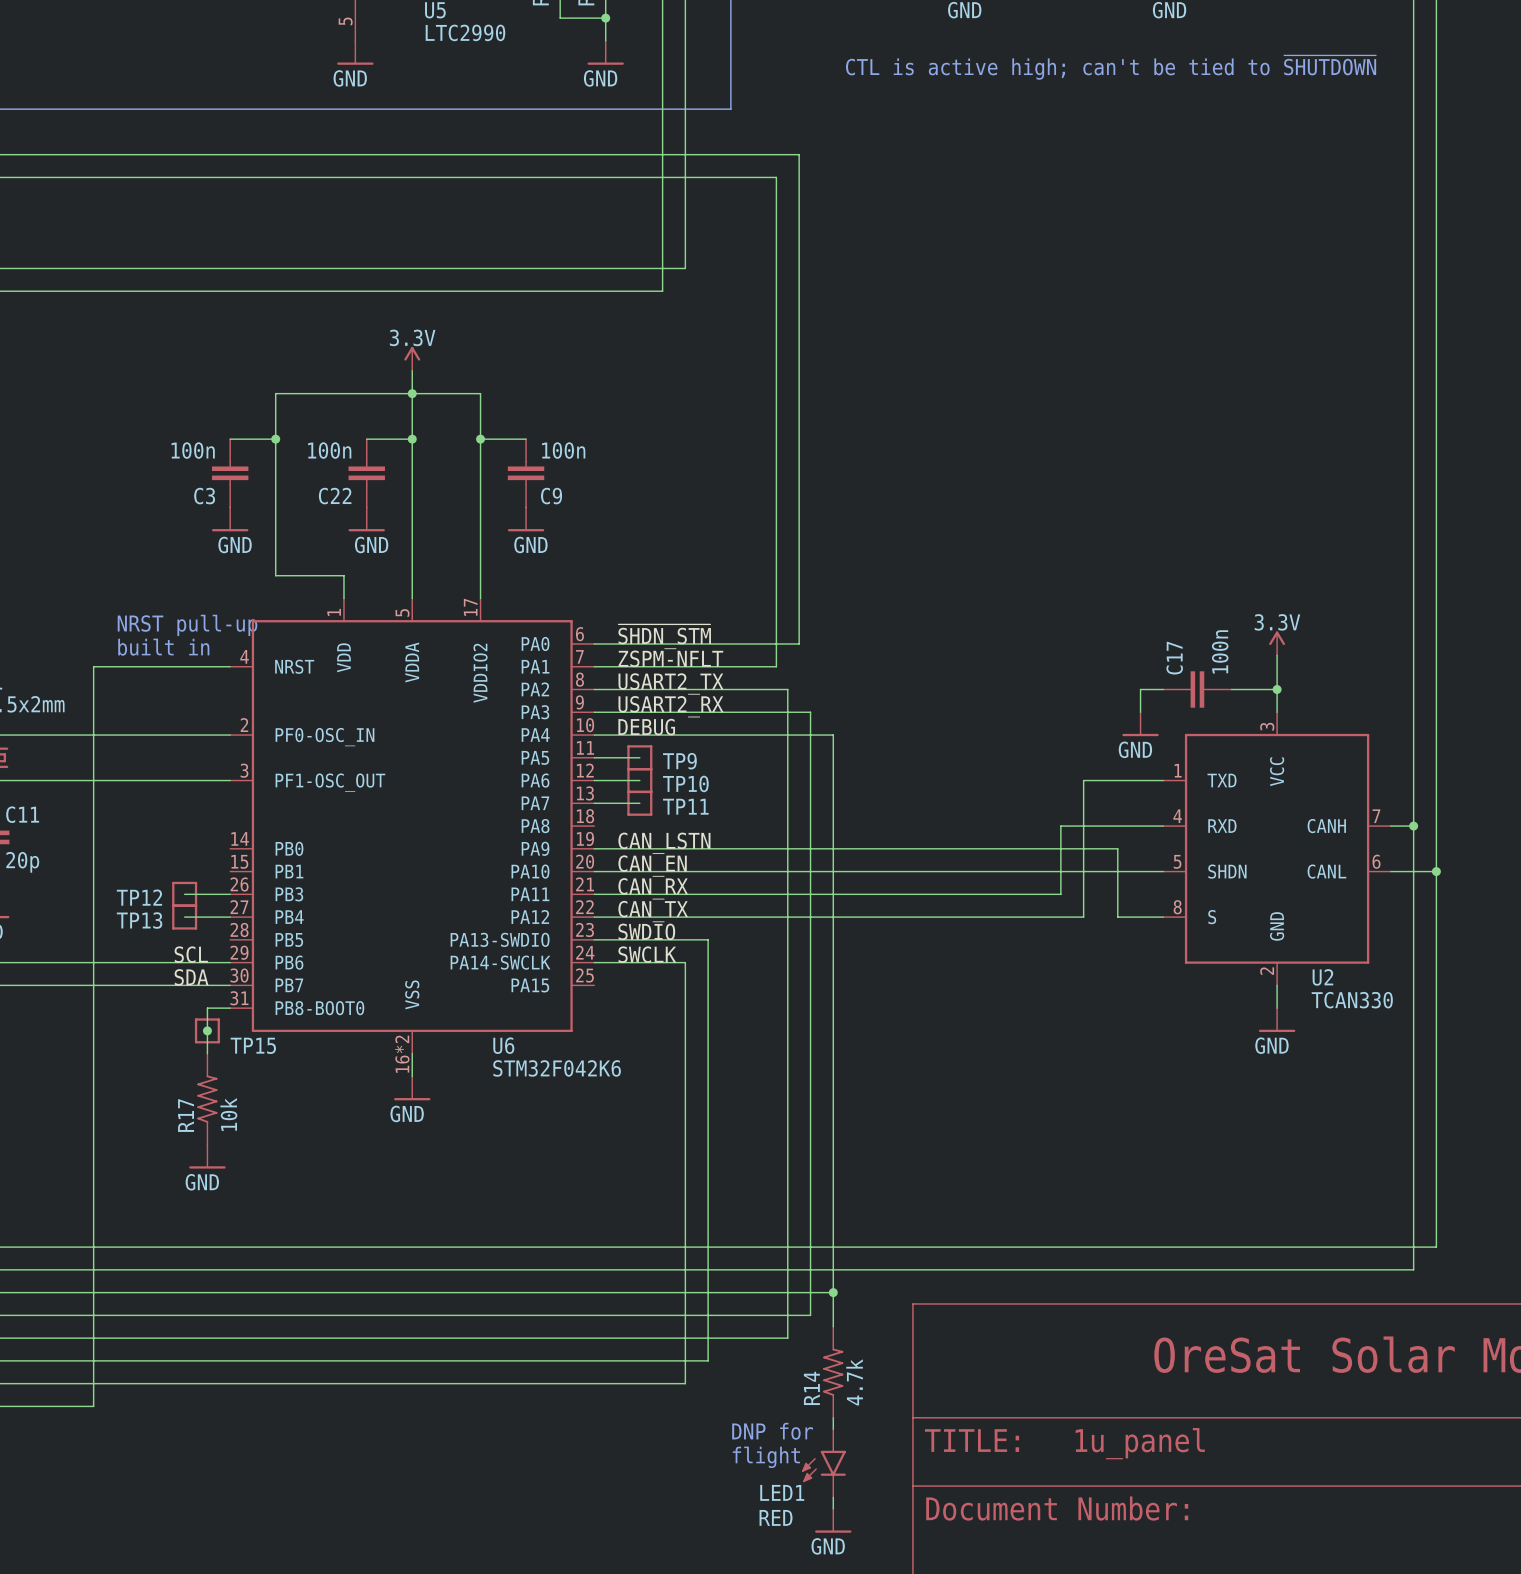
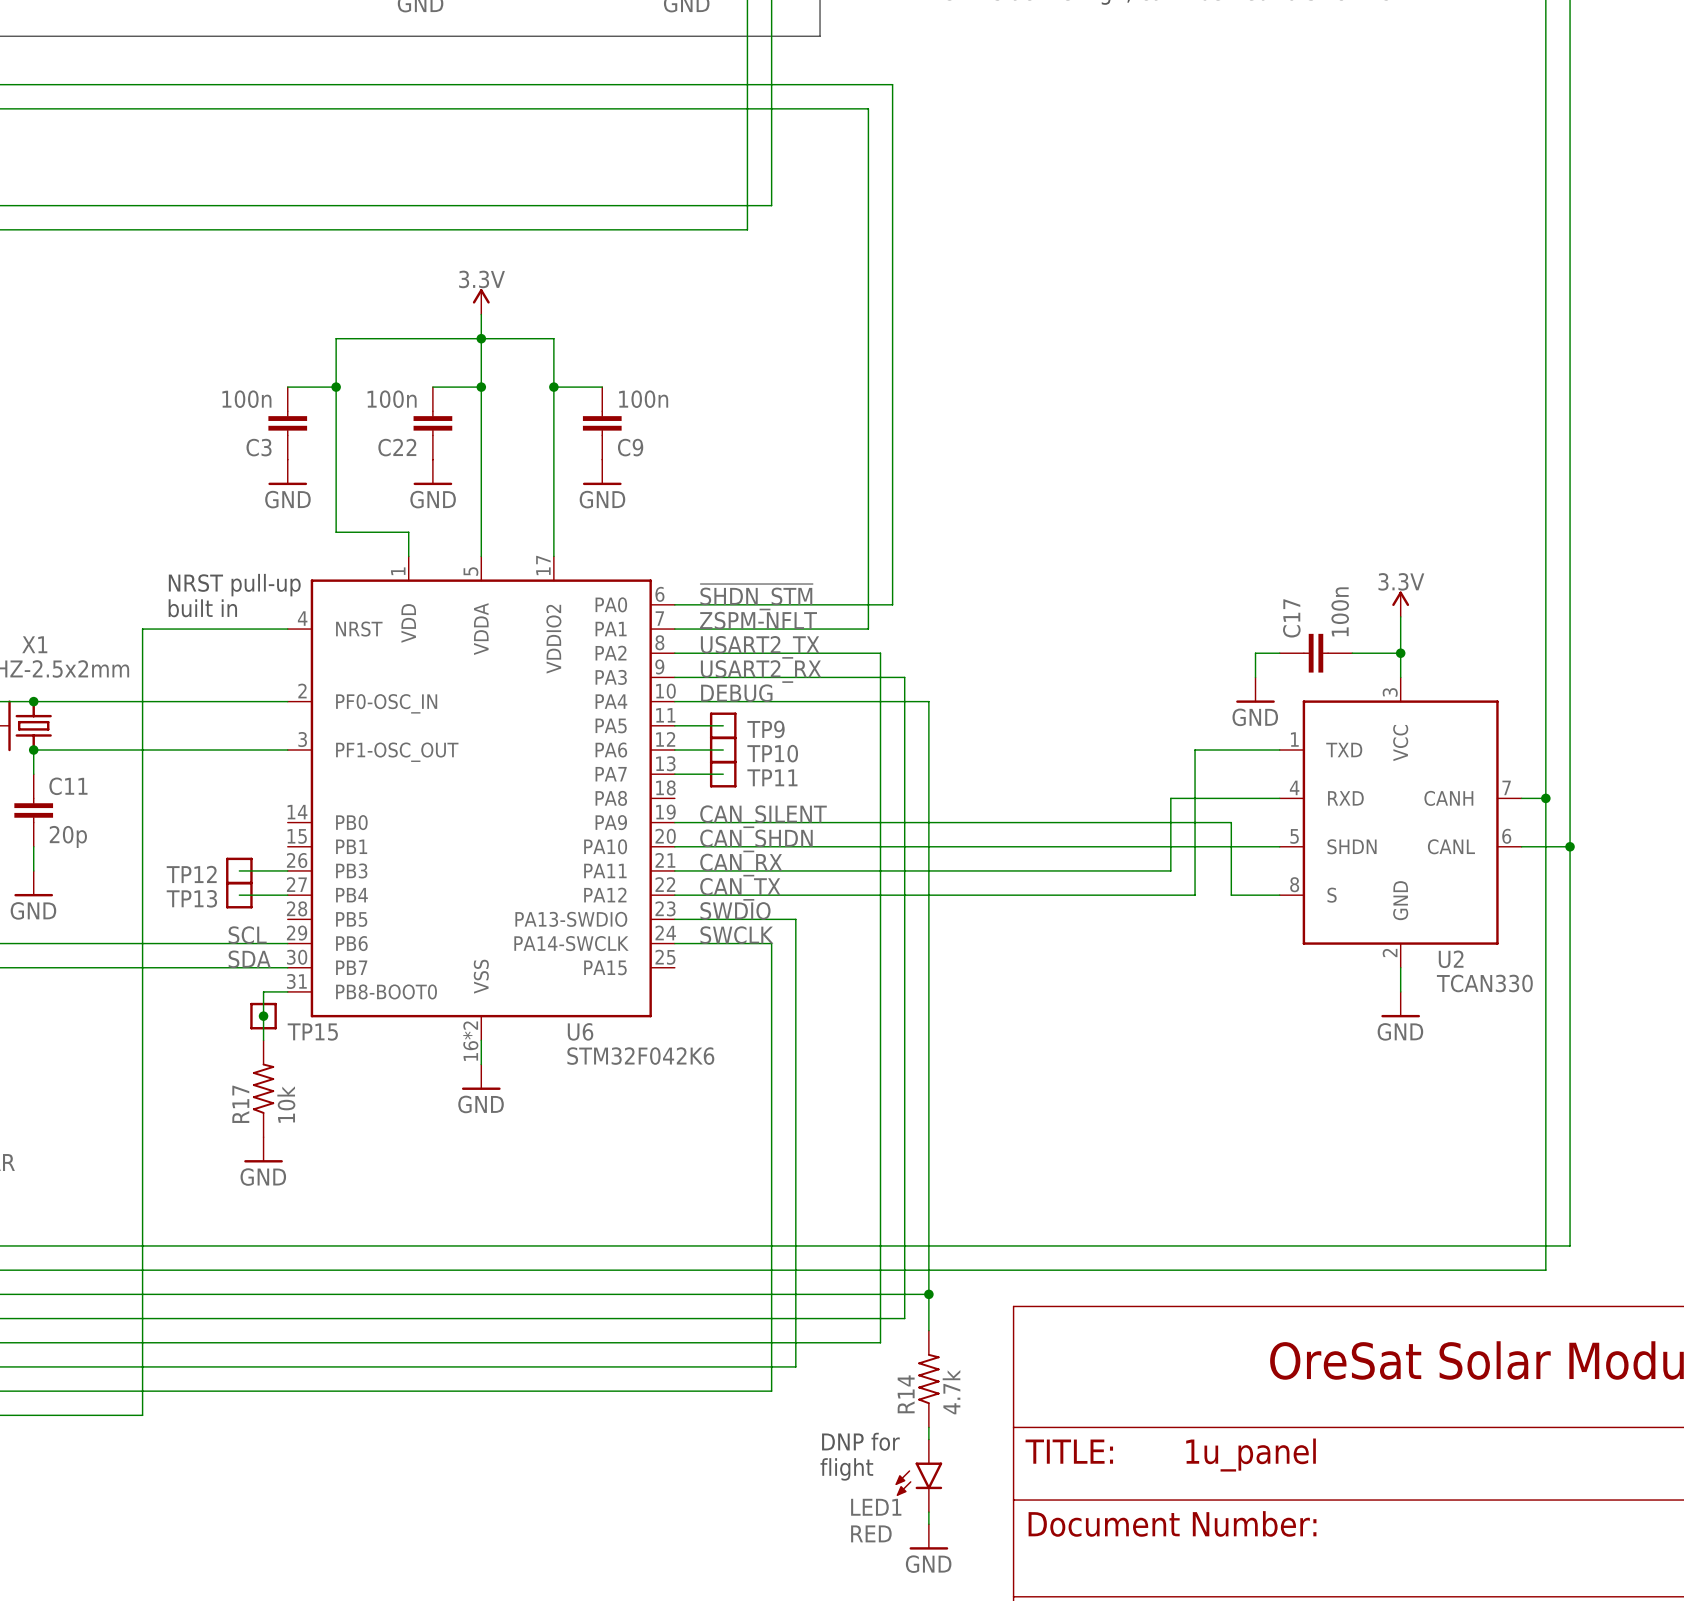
label: CAN_LSTN (664, 843) -> CAN_SILENT (763, 816)
label: CAN_EN (652, 866) -> CAN_SHDN (756, 840)

